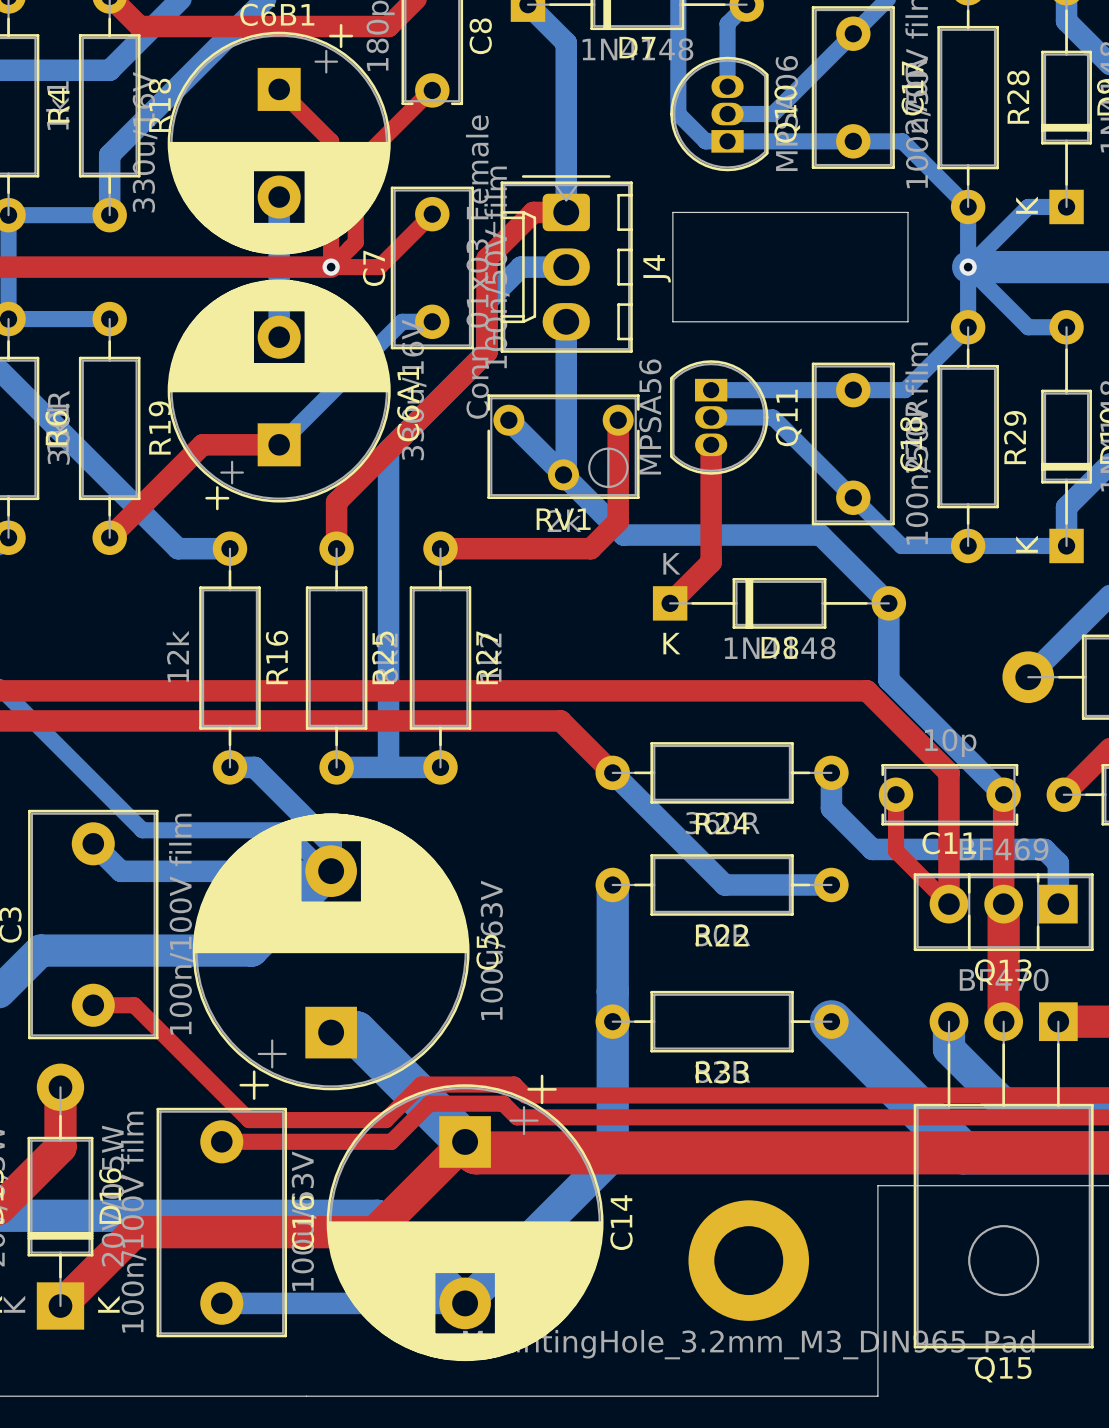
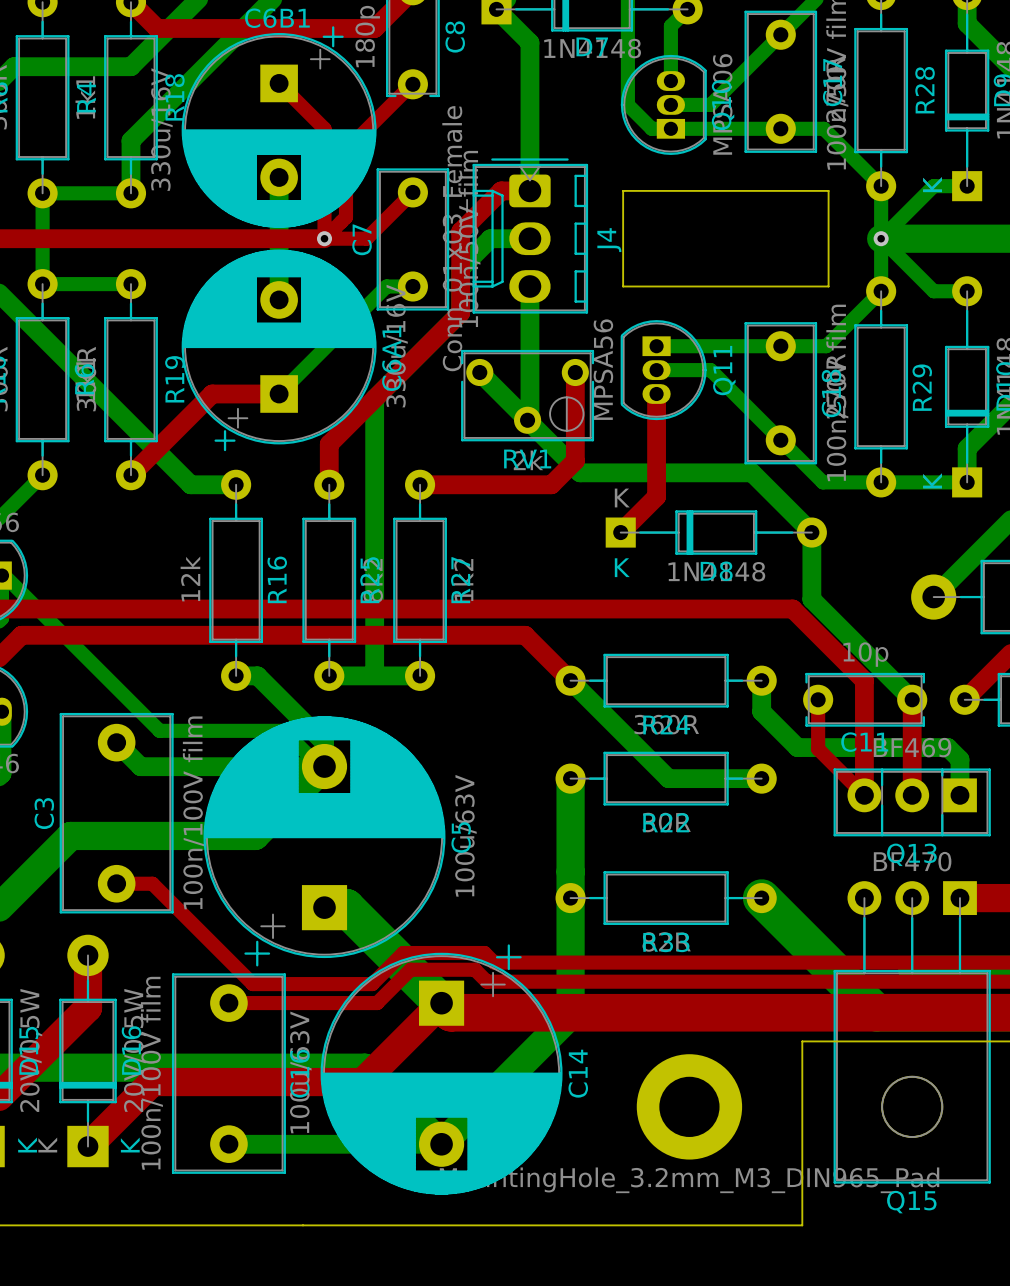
top track: (1003, 904) (1003, 1021) -> none
bottom track: (949, 1021) (949, 1049) (1003, 1103) -> none

